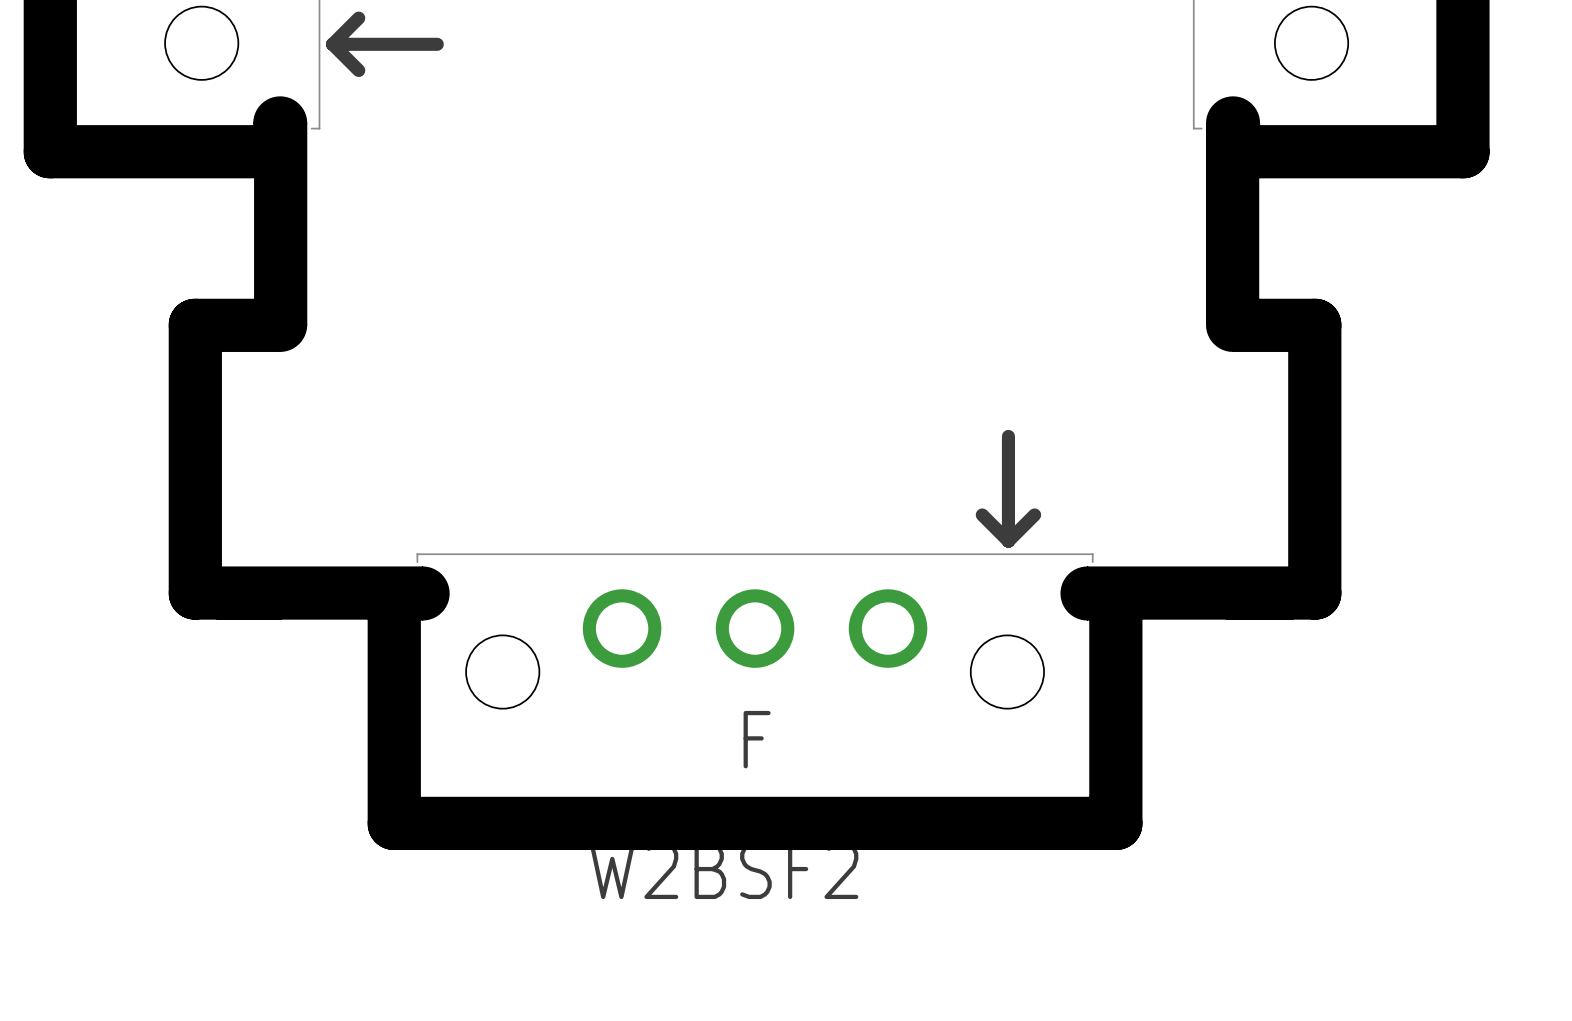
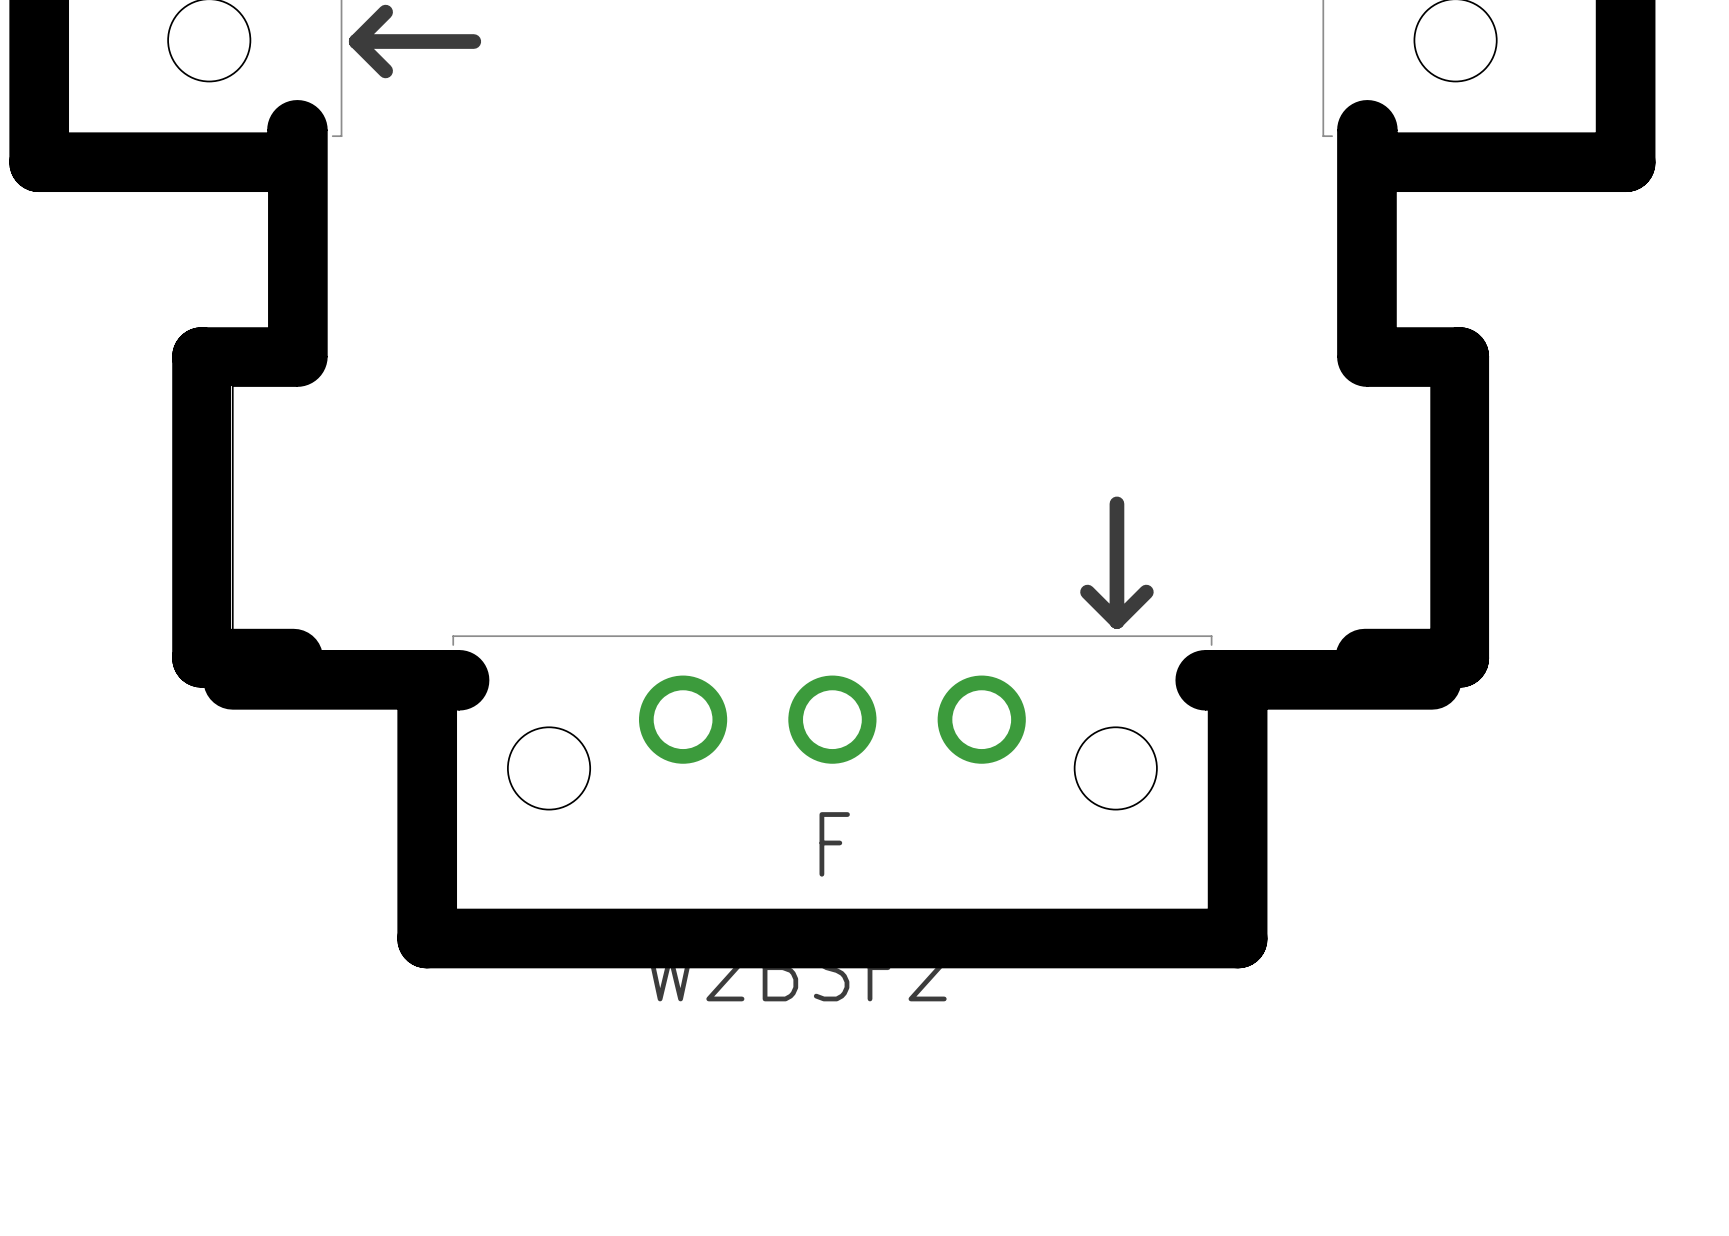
board edge: (222, 351) (221, 351) (221, 567) -> (232, 386) (232, 650)
board edge: (1289, 351) (1289, 567) -> (1430, 386) (1432, 386) (1432, 650)
part position: (755, 639) -> (832, 732)

